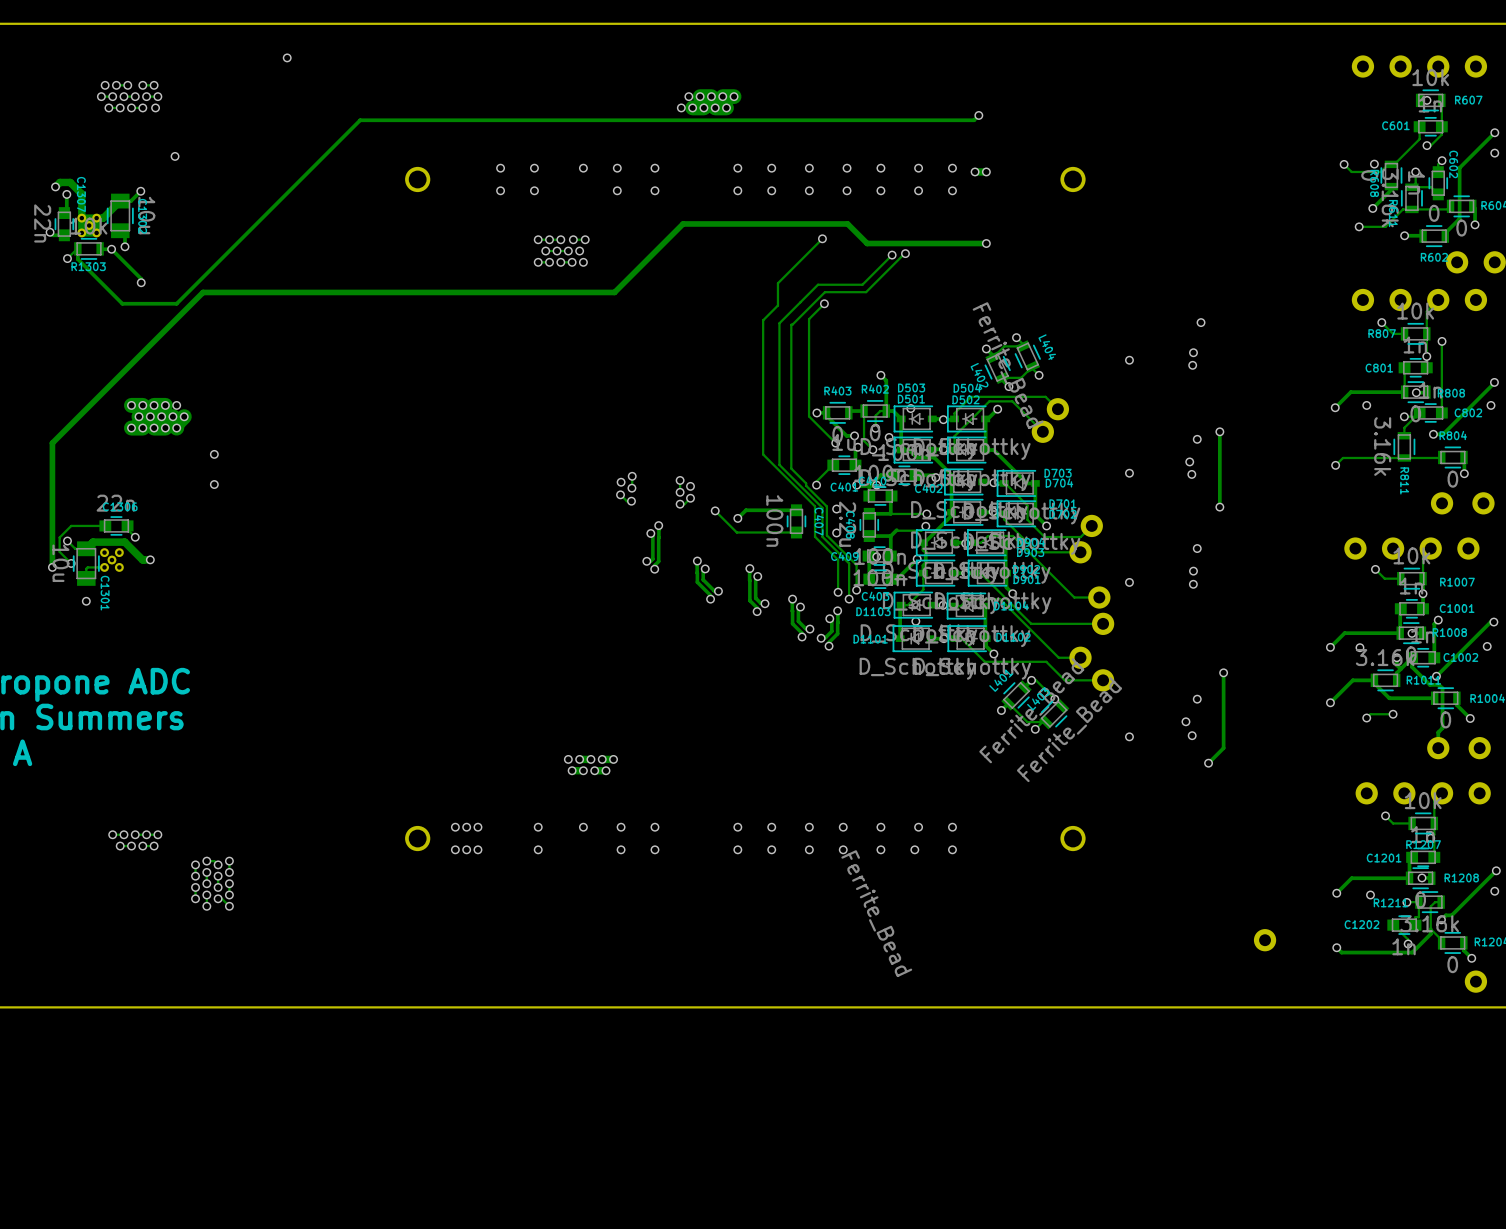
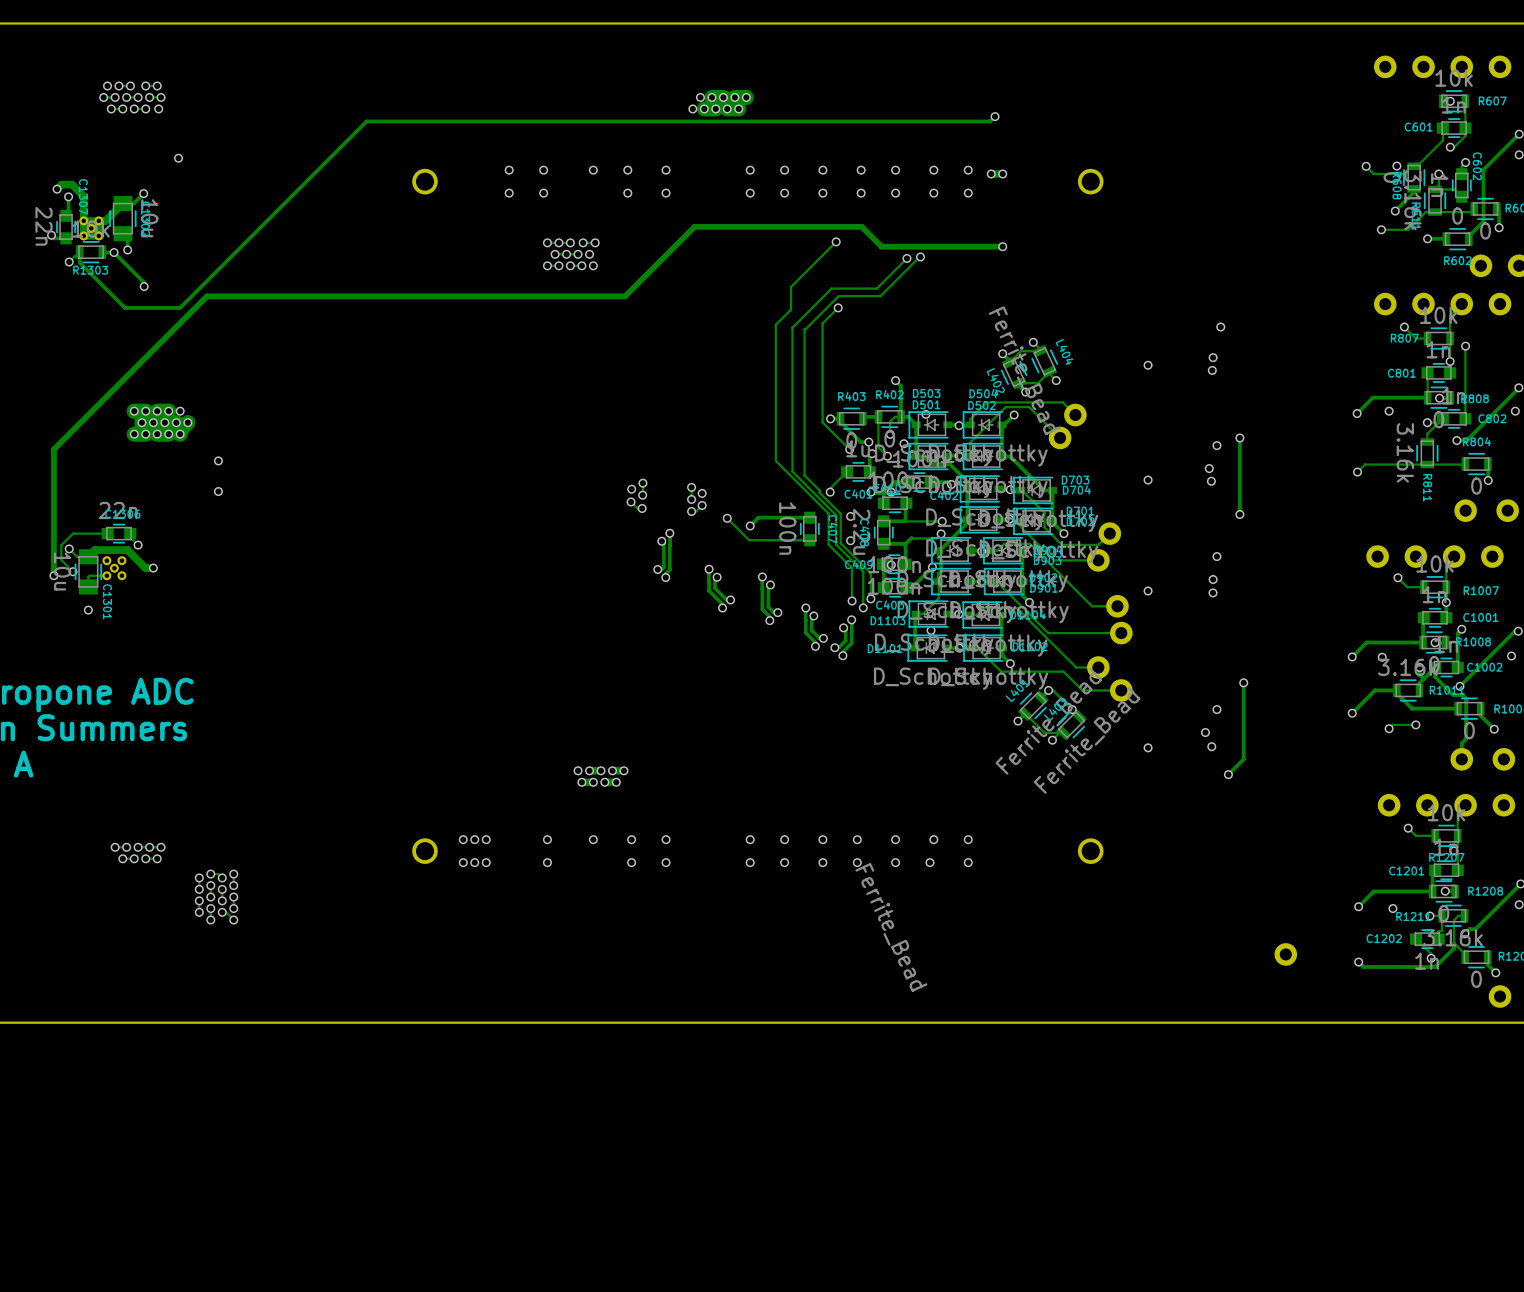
via: (287, 57) -> none

